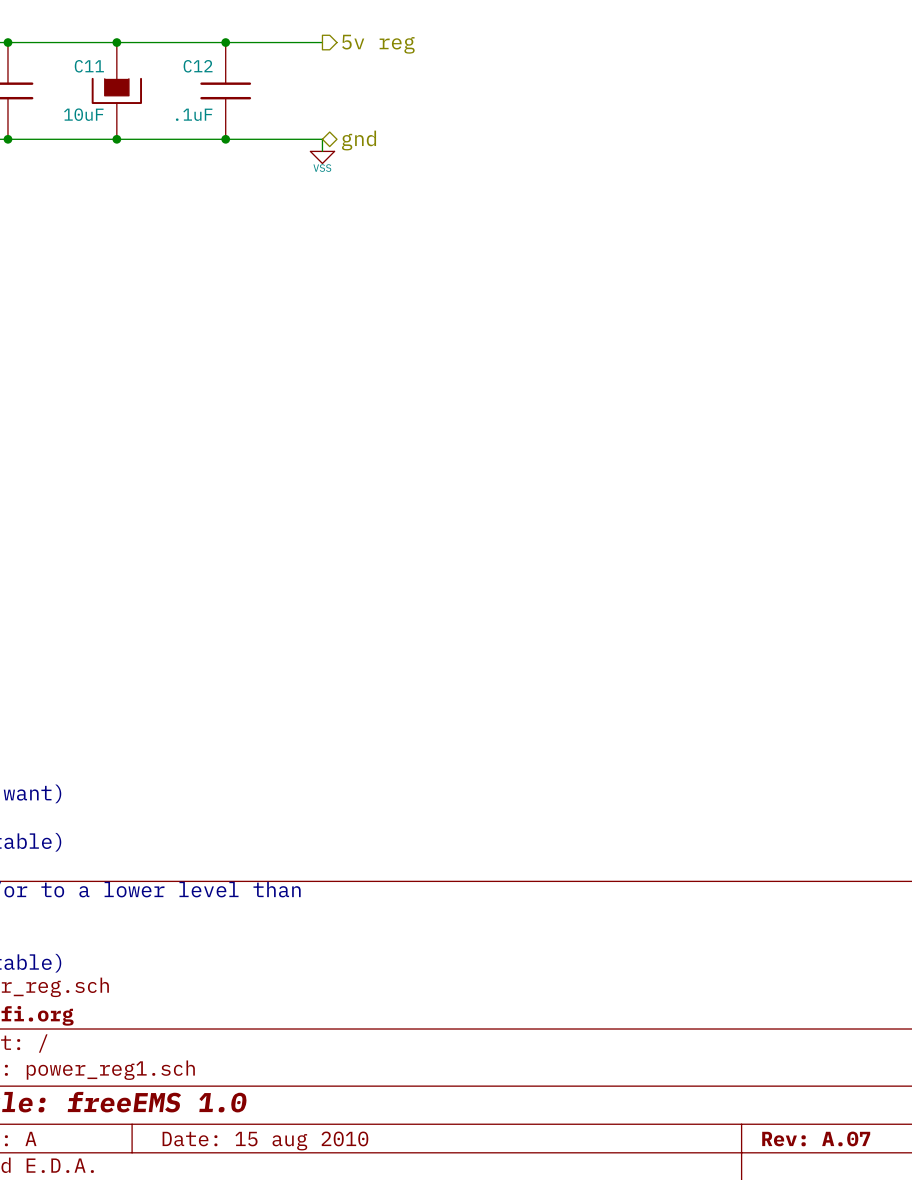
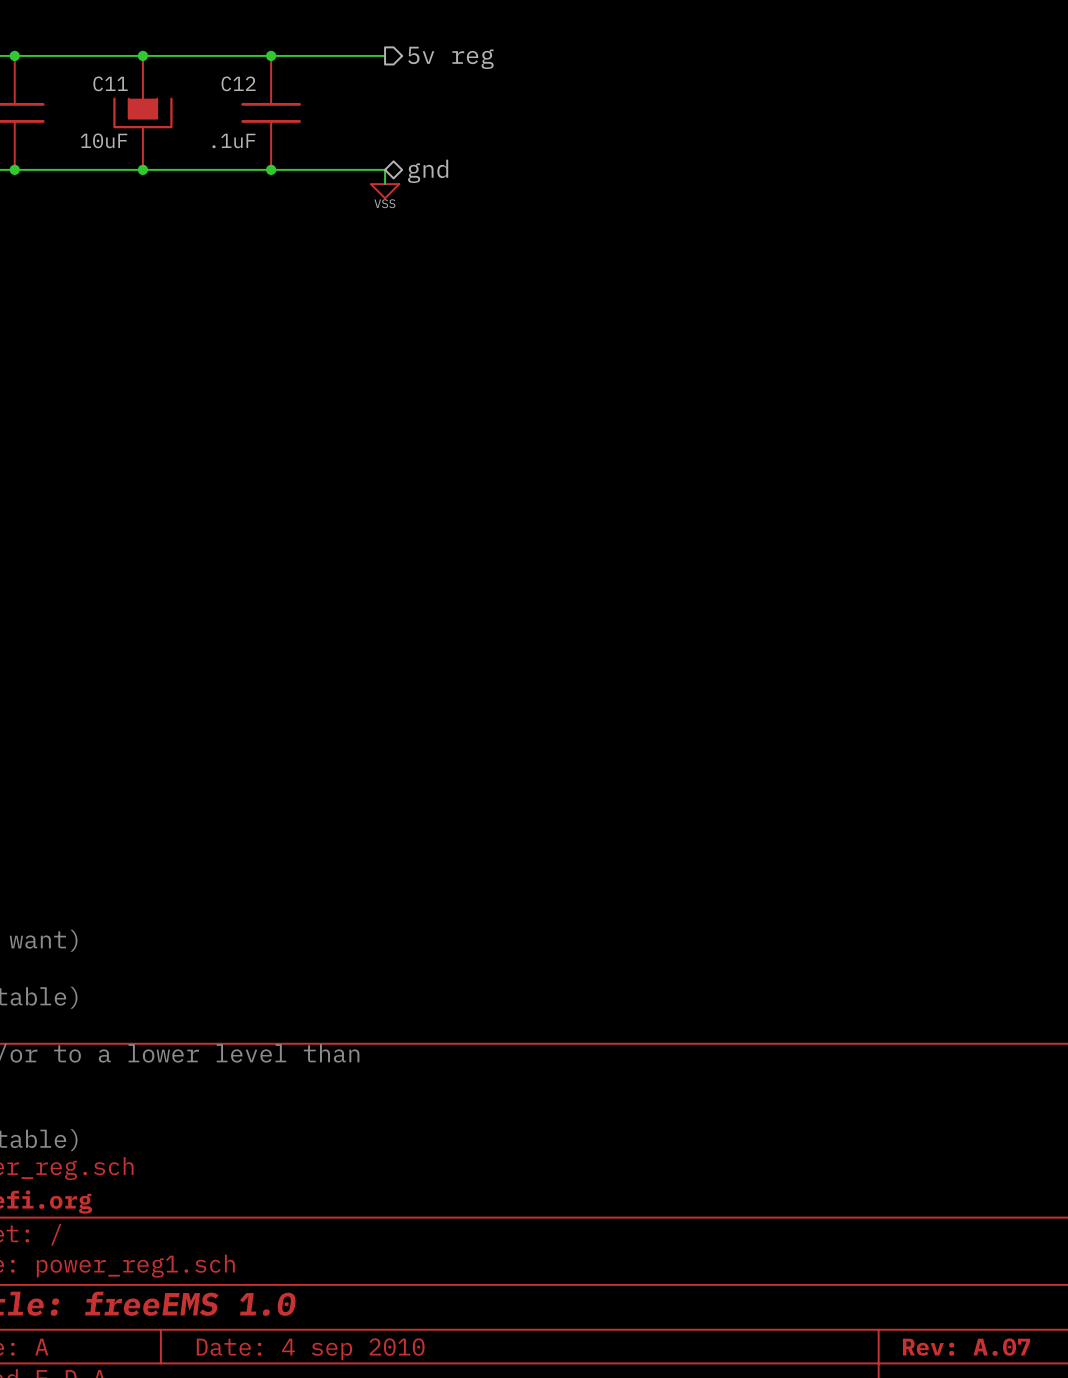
title block: Date: 15 aug 2010 (265, 1140) -> Date: 4 sep 2010 (310, 1349)

